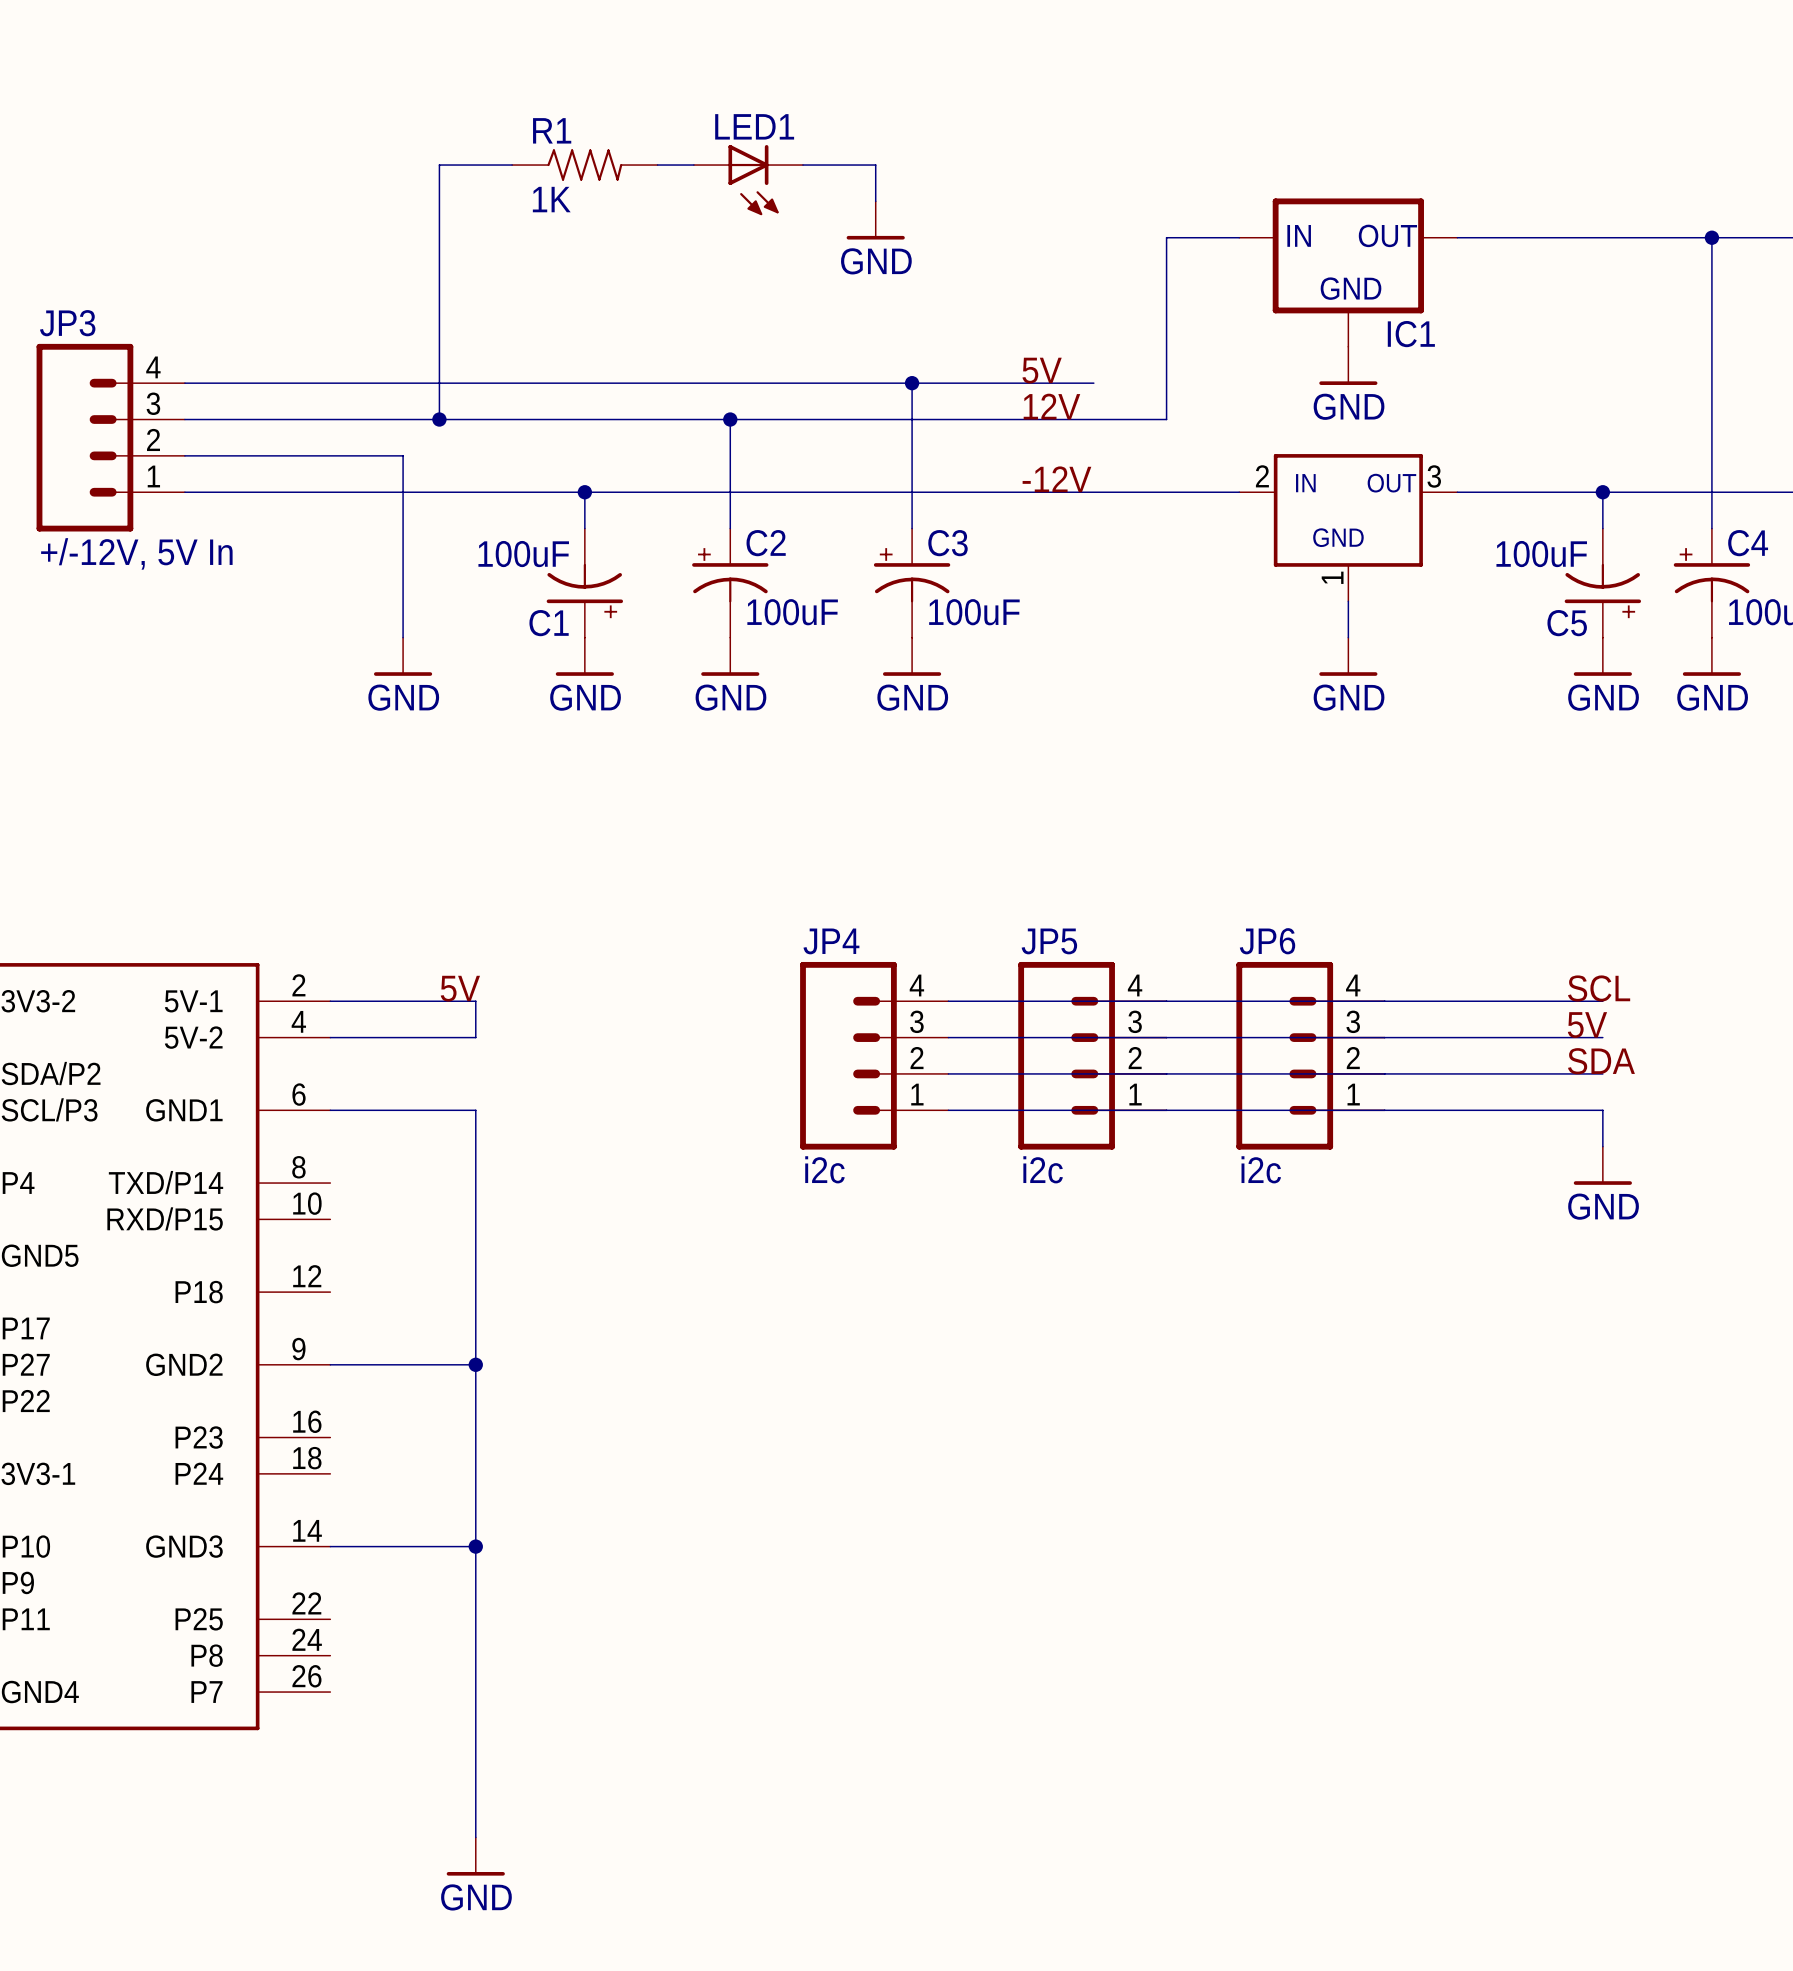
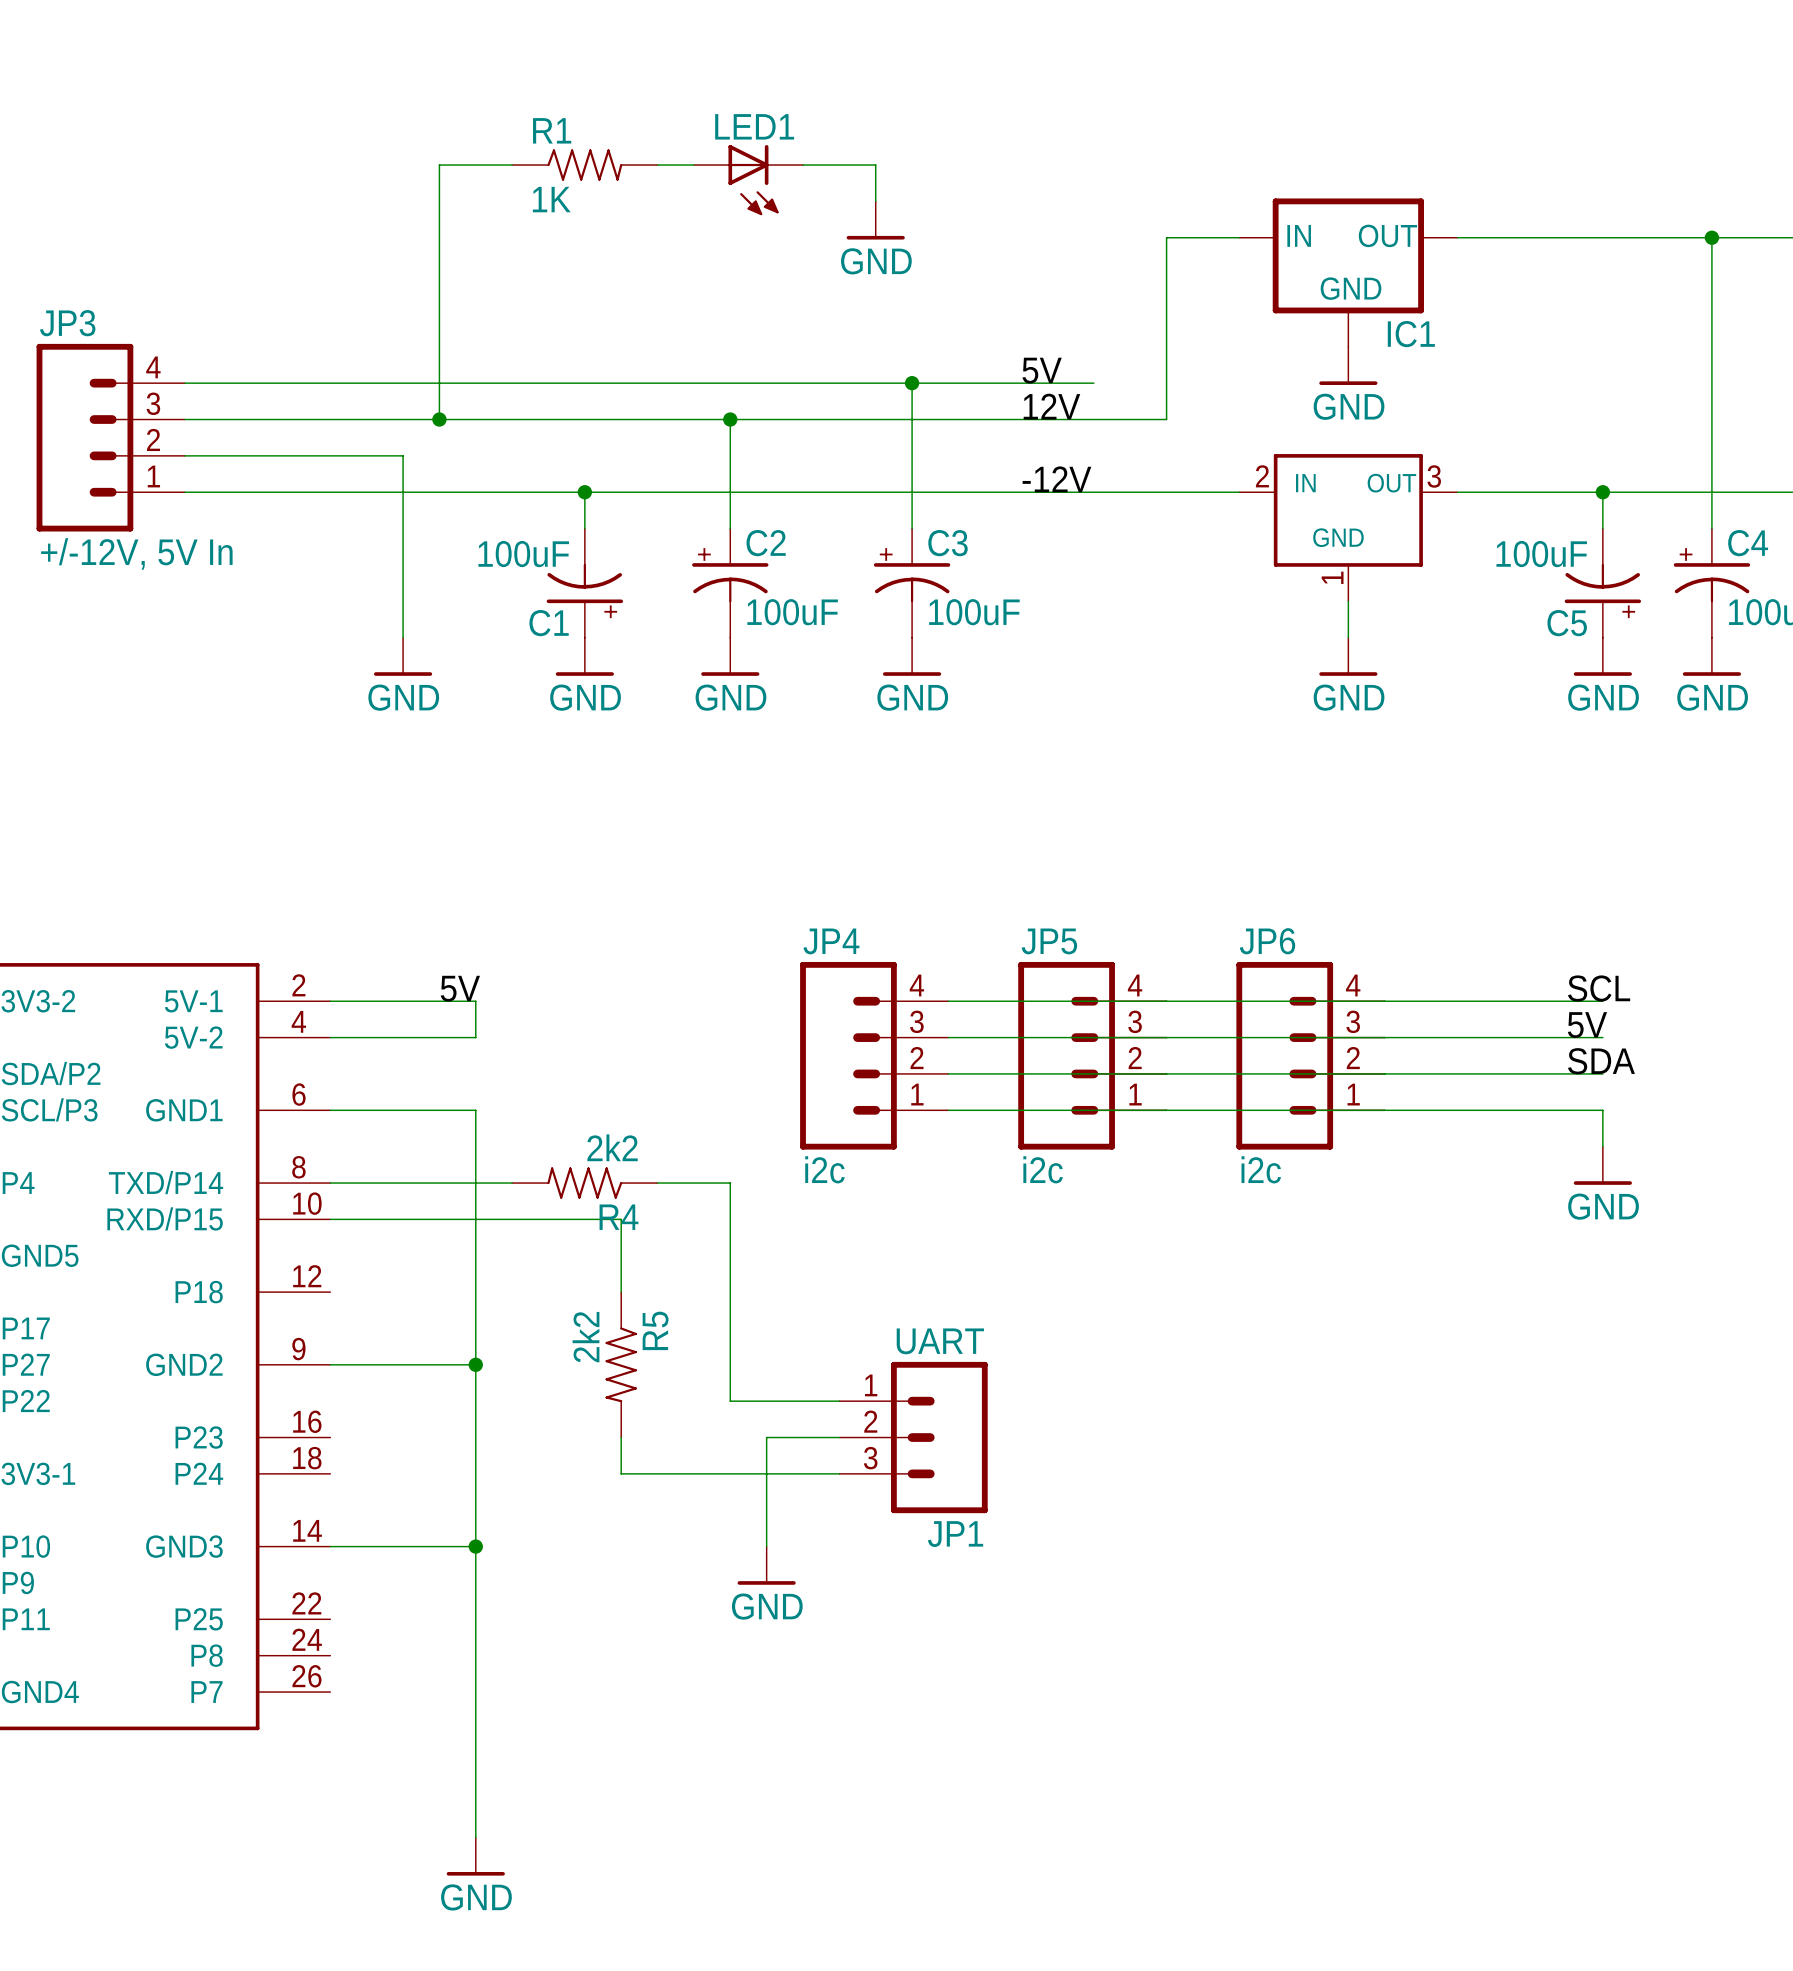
wire: none -> (330, 1183) (512, 1183)
R4: none -> 2k2 (584, 1183)
wire: none -> (657, 1183) (730, 1183) (730, 1401) (839, 1401)
wire: none -> (330, 1219) (621, 1219) (621, 1292)
R5: none -> 2k2 (621, 1364)
wire: none -> (621, 1437) (621, 1473) (839, 1473)
wire: none -> (839, 1437) (766, 1437) (766, 1546)
JP1: none -> UART (913, 1437)
power symbol: none -> GND (766, 1565)

